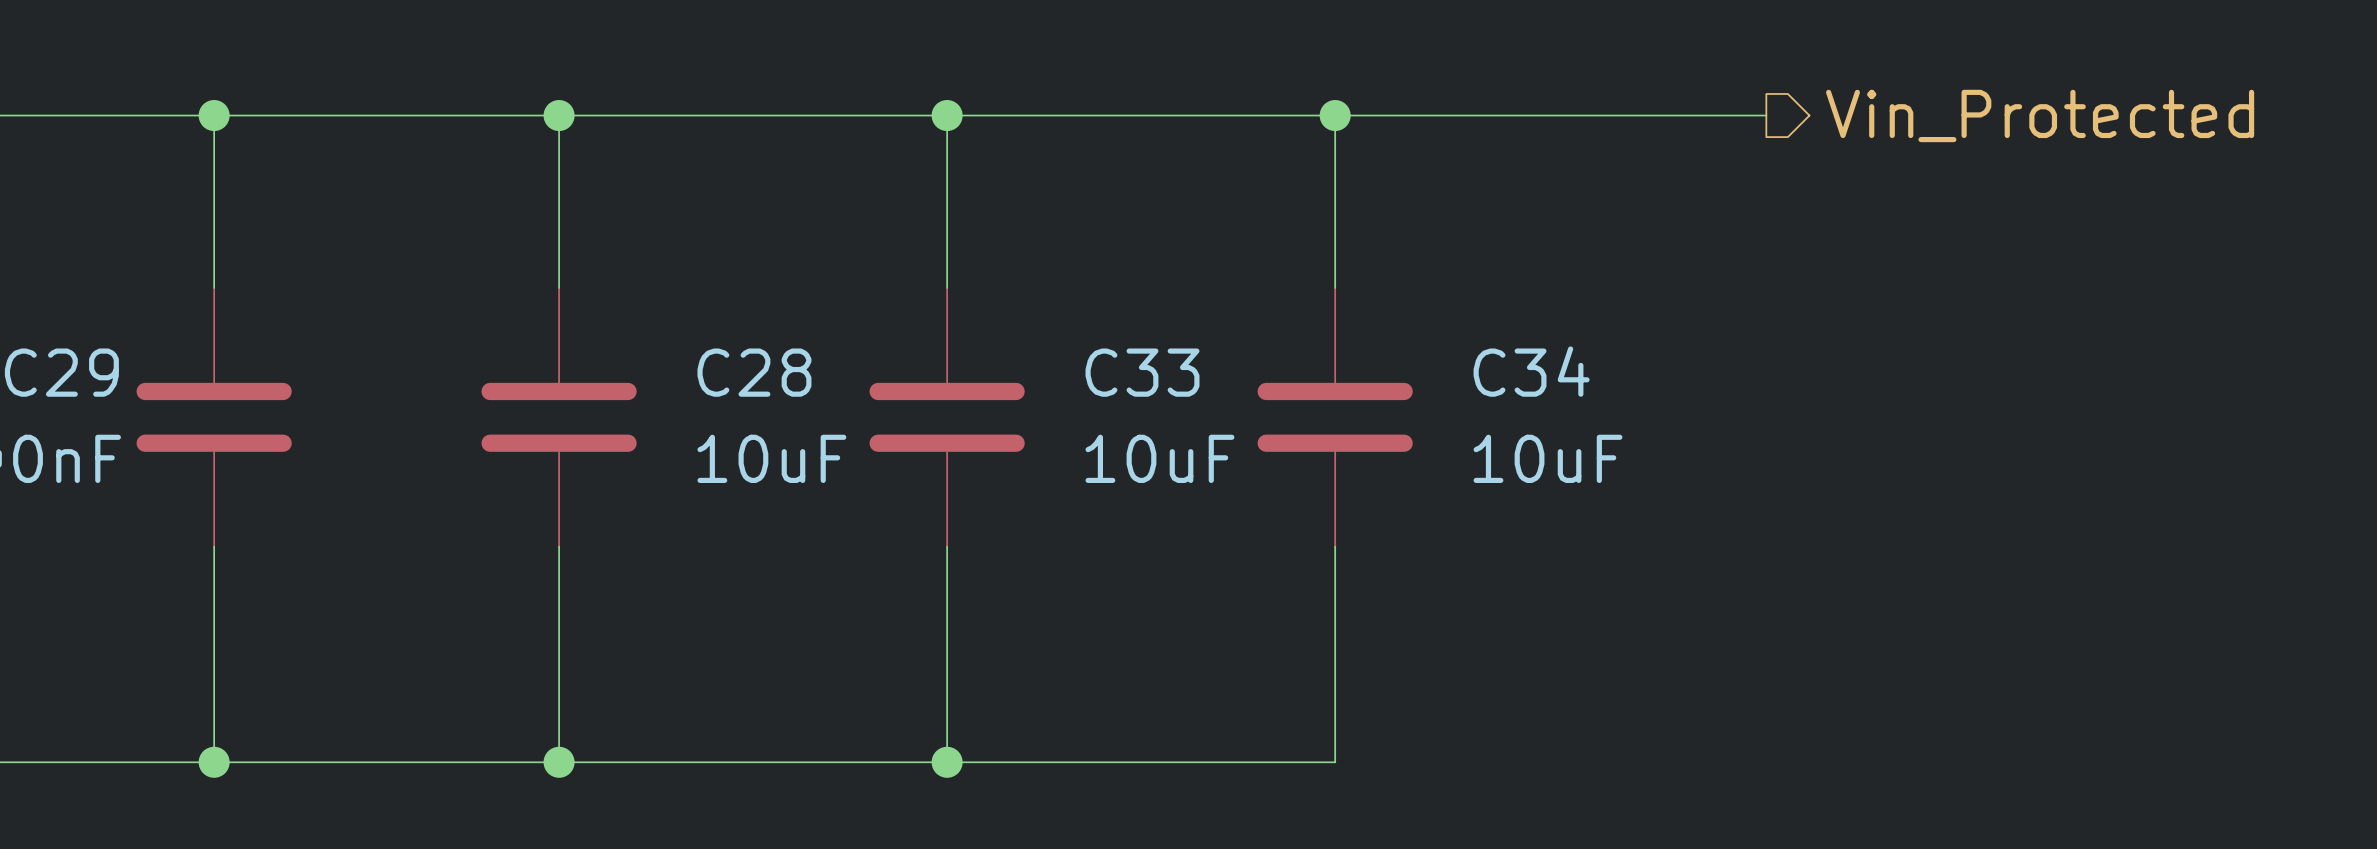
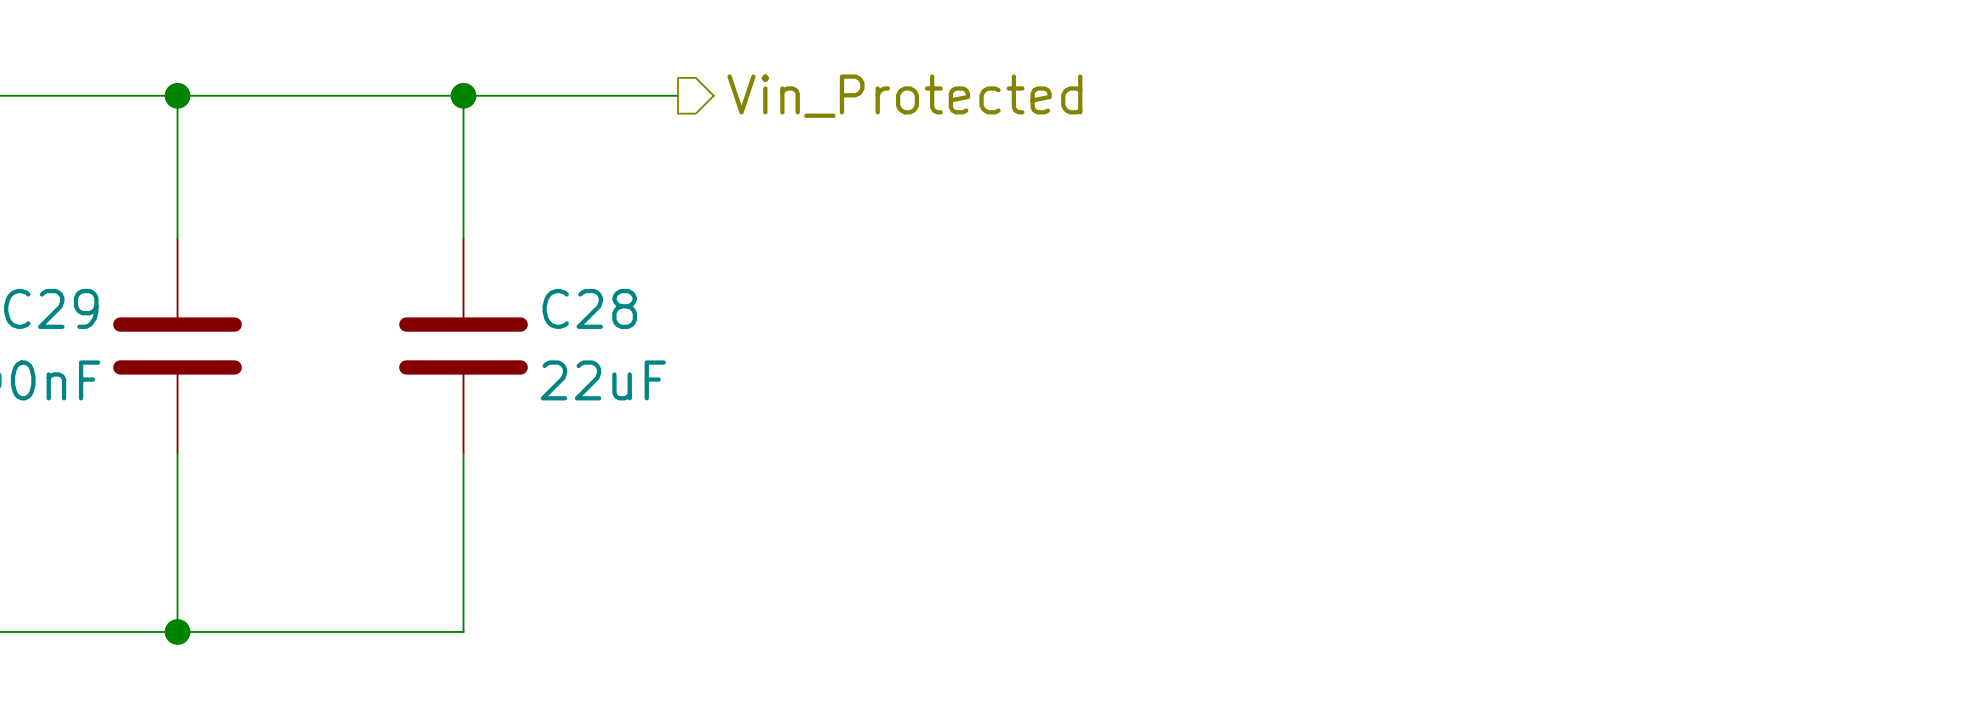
wire: (817, 115) (1766, 115) -> none
wire: (947, 115) (947, 288) -> none
junction: (947, 115) -> none
hierarchical label: none -> Vin_Protected (904, 96)
wire: (1335, 115) (1335, 288) -> none
junction: (1335, 115) -> none
hierarchical label: Vin_Protected (2040, 115) -> none
C28 name position: C28 (754, 372) -> C28 (589, 308)
C33: 10uF (947, 417) -> none
C34: 10uF (1335, 417) -> none
C28 value: 10uF (771, 458) -> 22uF (603, 380)
wire: (947, 546) (947, 762) -> none
wire: (1335, 546) (1335, 762) (559, 762) -> none
junction: (559, 762) -> none
junction: (947, 762) -> none

